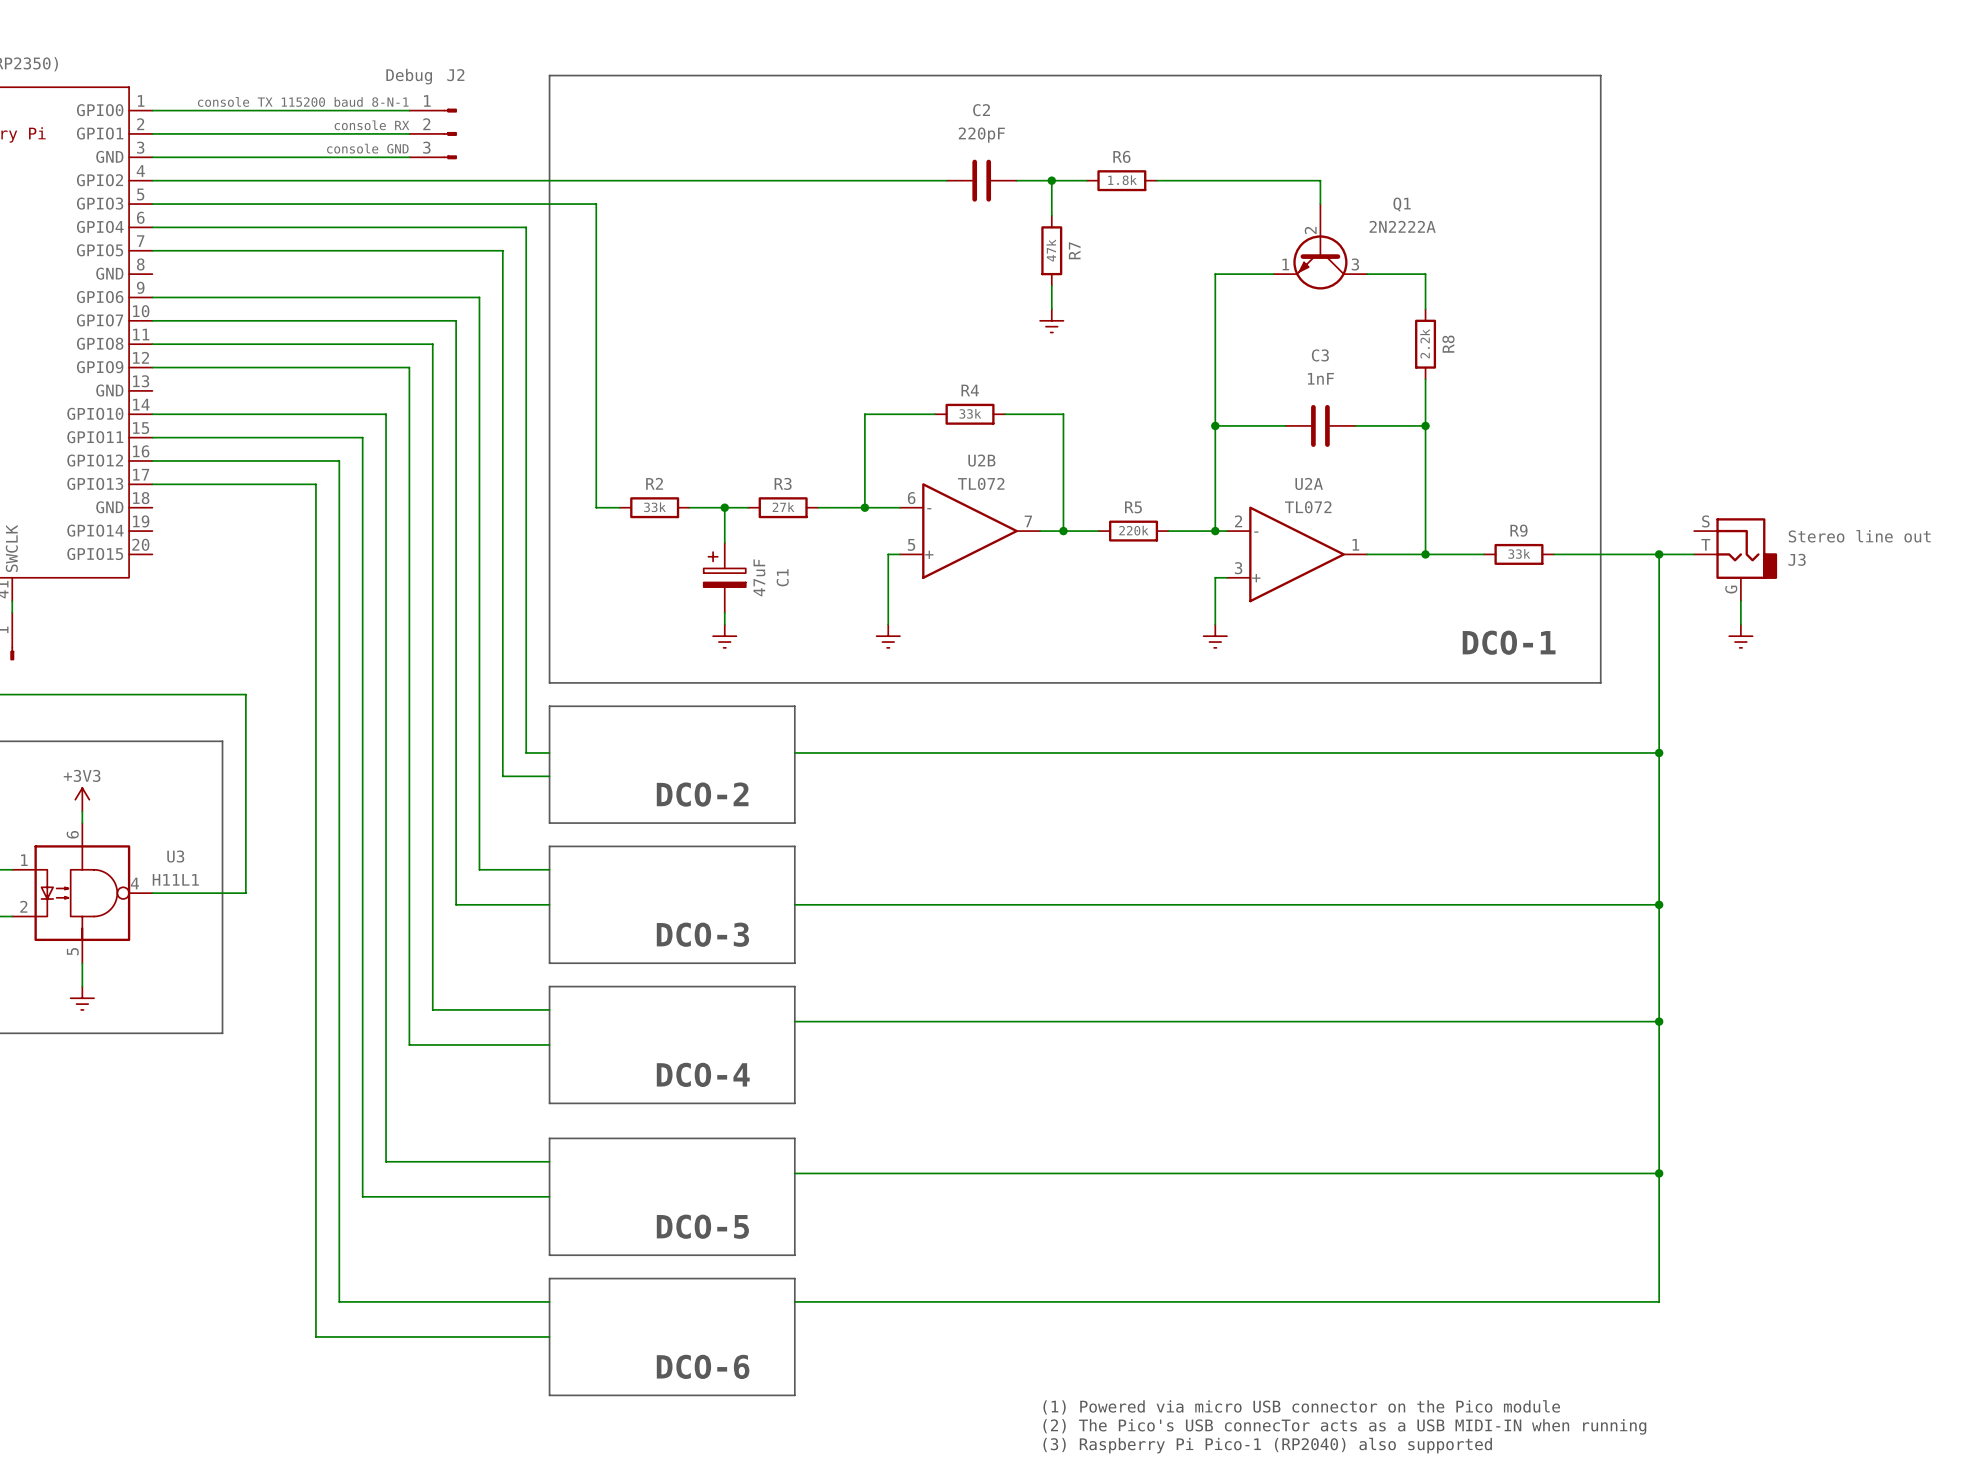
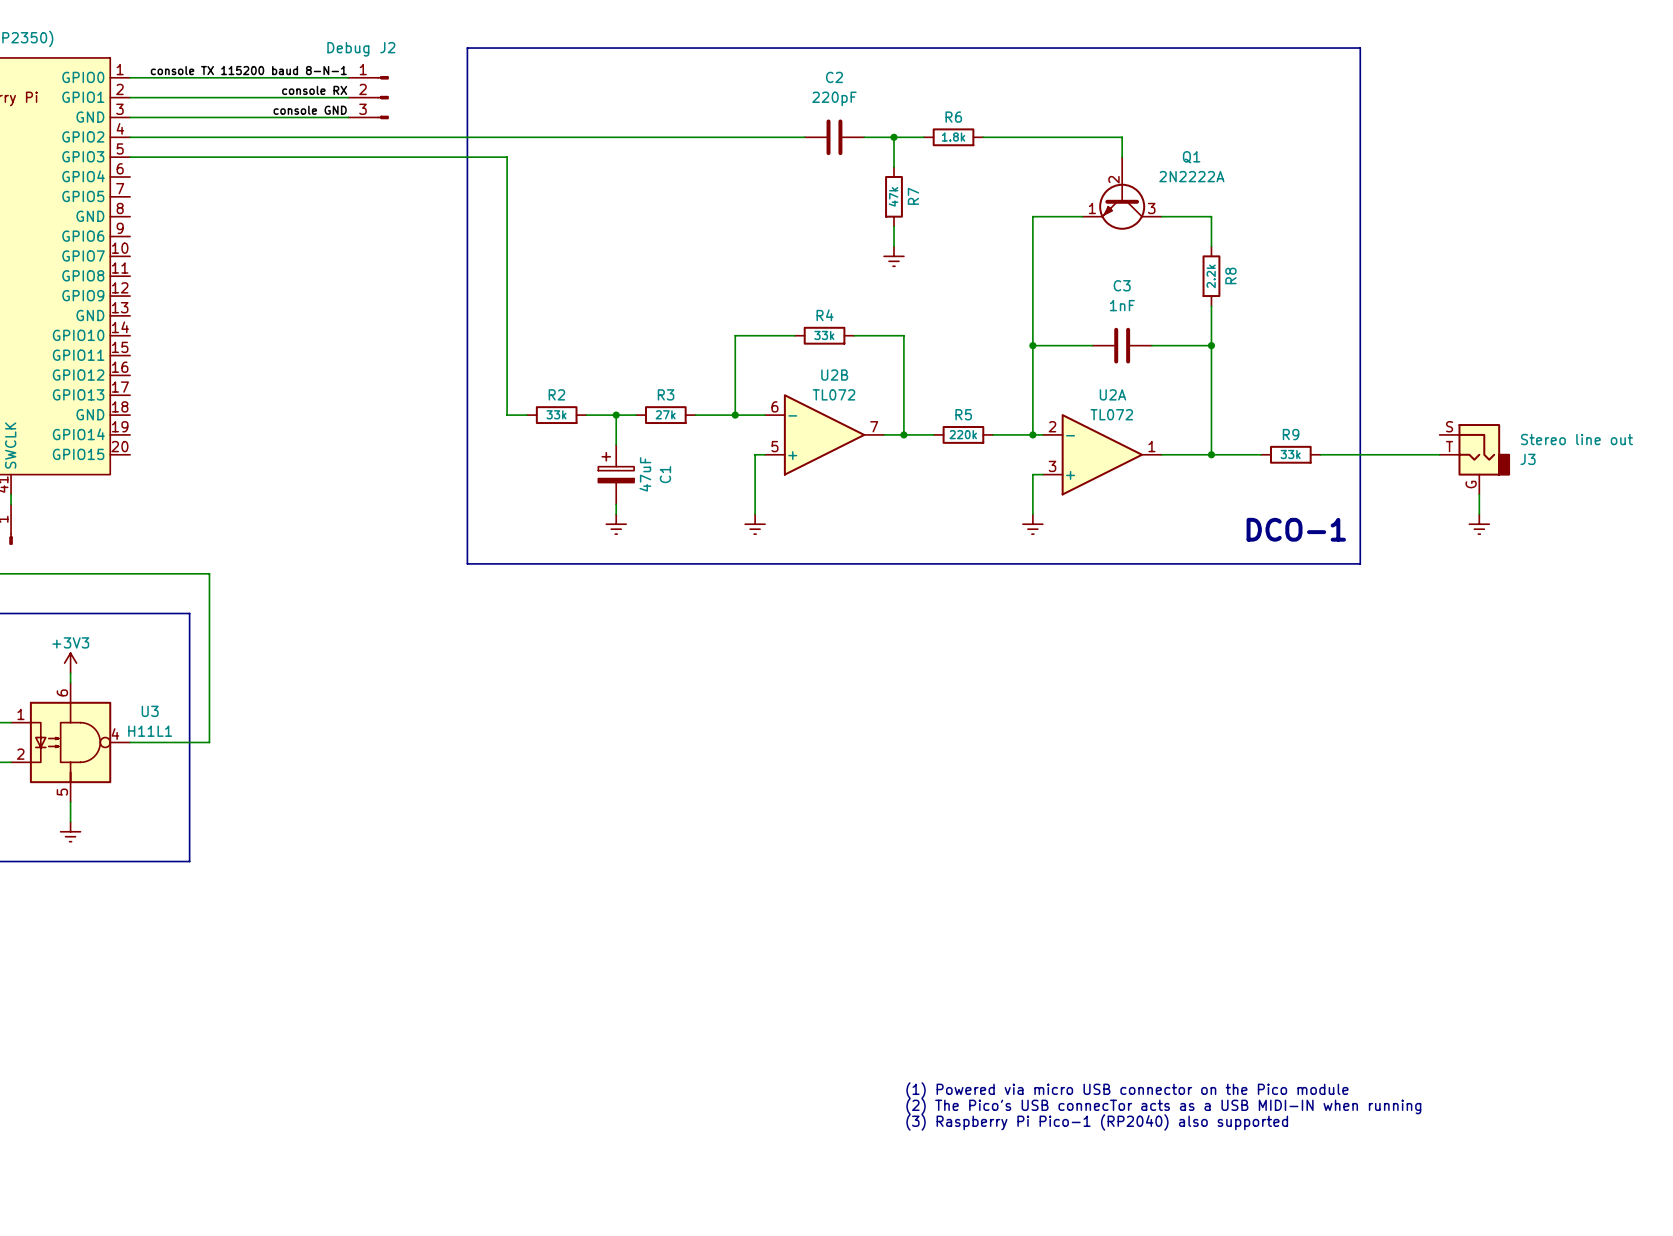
wire: (152, 227) (526, 227) (526, 752) (549, 752) -> none
wire: (152, 250) (502, 250) (502, 776) (549, 776) -> none
wire: (152, 297) (479, 297) (479, 869) (549, 869) -> none
wire: (152, 320) (456, 320) (456, 904) (549, 904) -> none
wire: (152, 344) (432, 344) (432, 1009) (549, 1009) -> none
wire: (152, 367) (409, 367) (409, 1044) (549, 1044) -> none
wire: (152, 414) (386, 414) (386, 1161) (549, 1161) -> none
wire: (152, 437) (362, 437) (362, 1196) (549, 1196) -> none
wire: (152, 460) (339, 460) (339, 1301) (549, 1301) -> none
wire: (152, 484) (315, 484) (315, 1336) (549, 1336) -> none
wire: (1659, 554) (1659, 1301) (794, 1301) -> none
junction: (1659, 554) -> none
line: (549, 706) (549, 823) (794, 823) (794, 706) (549, 706) -> none
wire: (794, 752) (1659, 752) -> none
junction: (1659, 752) -> none
text: DCO-2 (702, 794) -> none
line: (549, 846) (549, 963) (794, 963) (794, 846) (549, 846) -> none
wire: (794, 904) (1659, 904) -> none
junction: (1659, 904) -> none
text: DCO-3 (702, 934) -> none
line: (549, 986) (549, 1103) (794, 1103) (794, 986) (549, 986) -> none
wire: (794, 1021) (1659, 1021) -> none
junction: (1659, 1021) -> none
text: DCO-4 (703, 1074) -> none
line: (549, 1138) (794, 1138) (794, 1255) (549, 1255) (549, 1138) -> none
wire: (794, 1173) (1659, 1173) -> none
junction: (1659, 1173) -> none
text: DCO-5 (702, 1226) -> none
line: (549, 1278) (549, 1395) (794, 1395) (794, 1278) (549, 1278) -> none
text: DCO-6 (703, 1366) -> none
text position: (1) Powered via micro USB connector on the Pico module (1301, 1407) -> (1) Powered via micro USB connector on the Pico module (1127, 1090)
text position: (2) The Pico's USB connecTor acts as a USB MIDI-IN when running (1344, 1426) -> (2) The Pico's USB connecTor acts as a USB MIDI-IN when running (1163, 1106)
text position: (3) Raspberry Pi Pico-1 (RP2040) also supported (1267, 1445) -> (3) Raspberry Pi Pico-1 (RP2040) also supported (1097, 1122)

